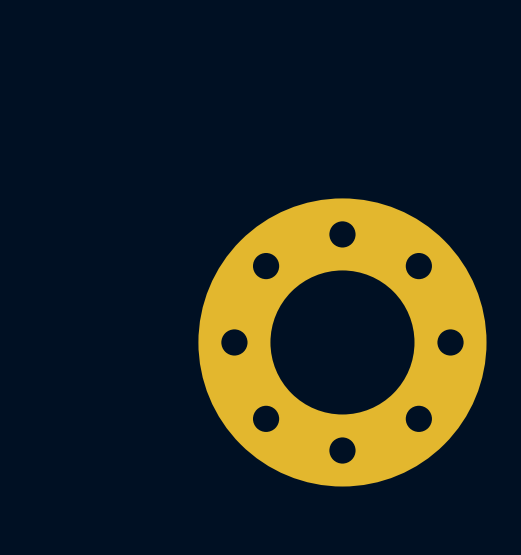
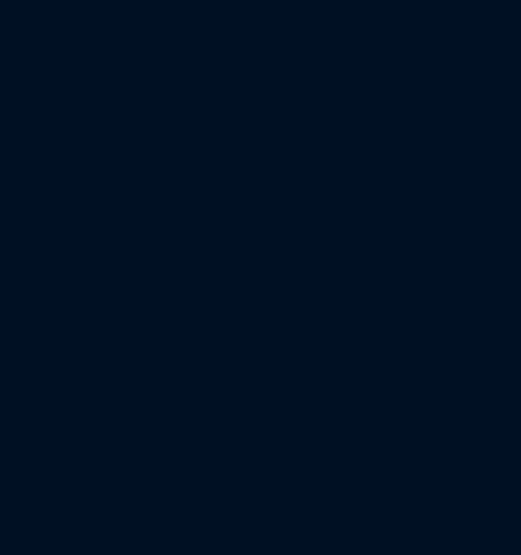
part: (342, 342) -> none

